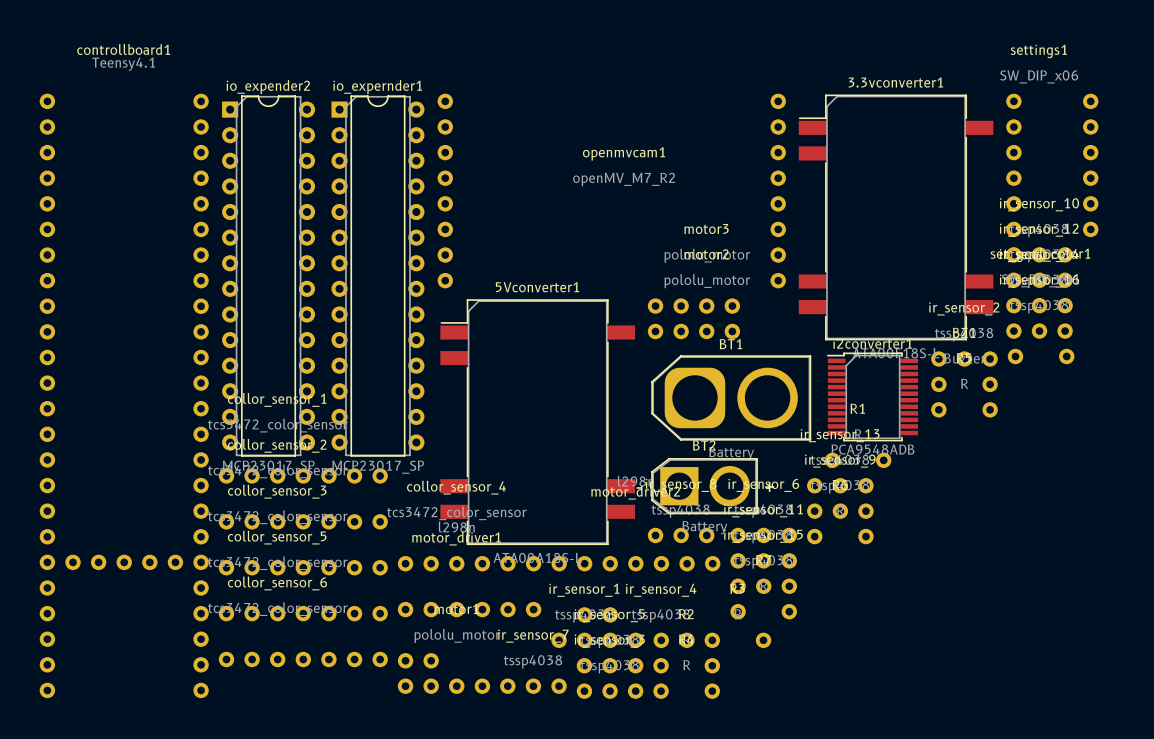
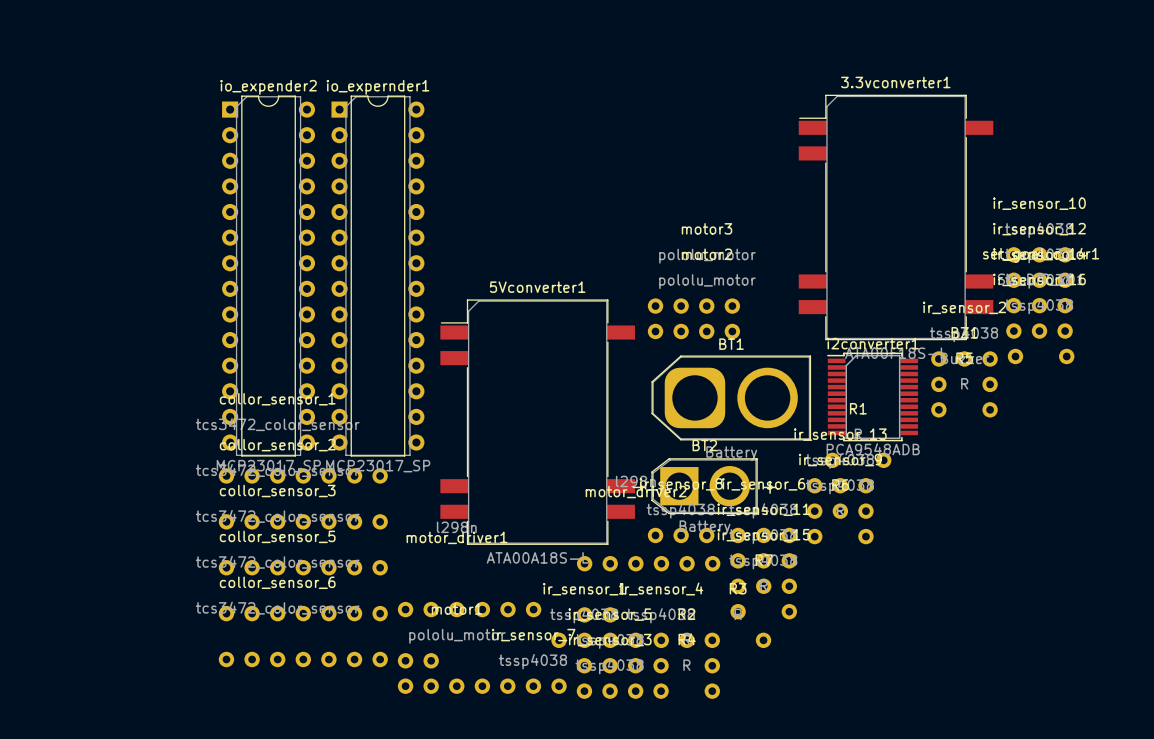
settings1: SW_DIP_x06 (1052, 165) -> none
openmvcam1: openMV_M7_R2 (611, 191) -> none
controllboard1: Teensy4.1 (124, 395) -> none
collor_sensor_4: tcs3472_color_sensor (482, 563) -> none

